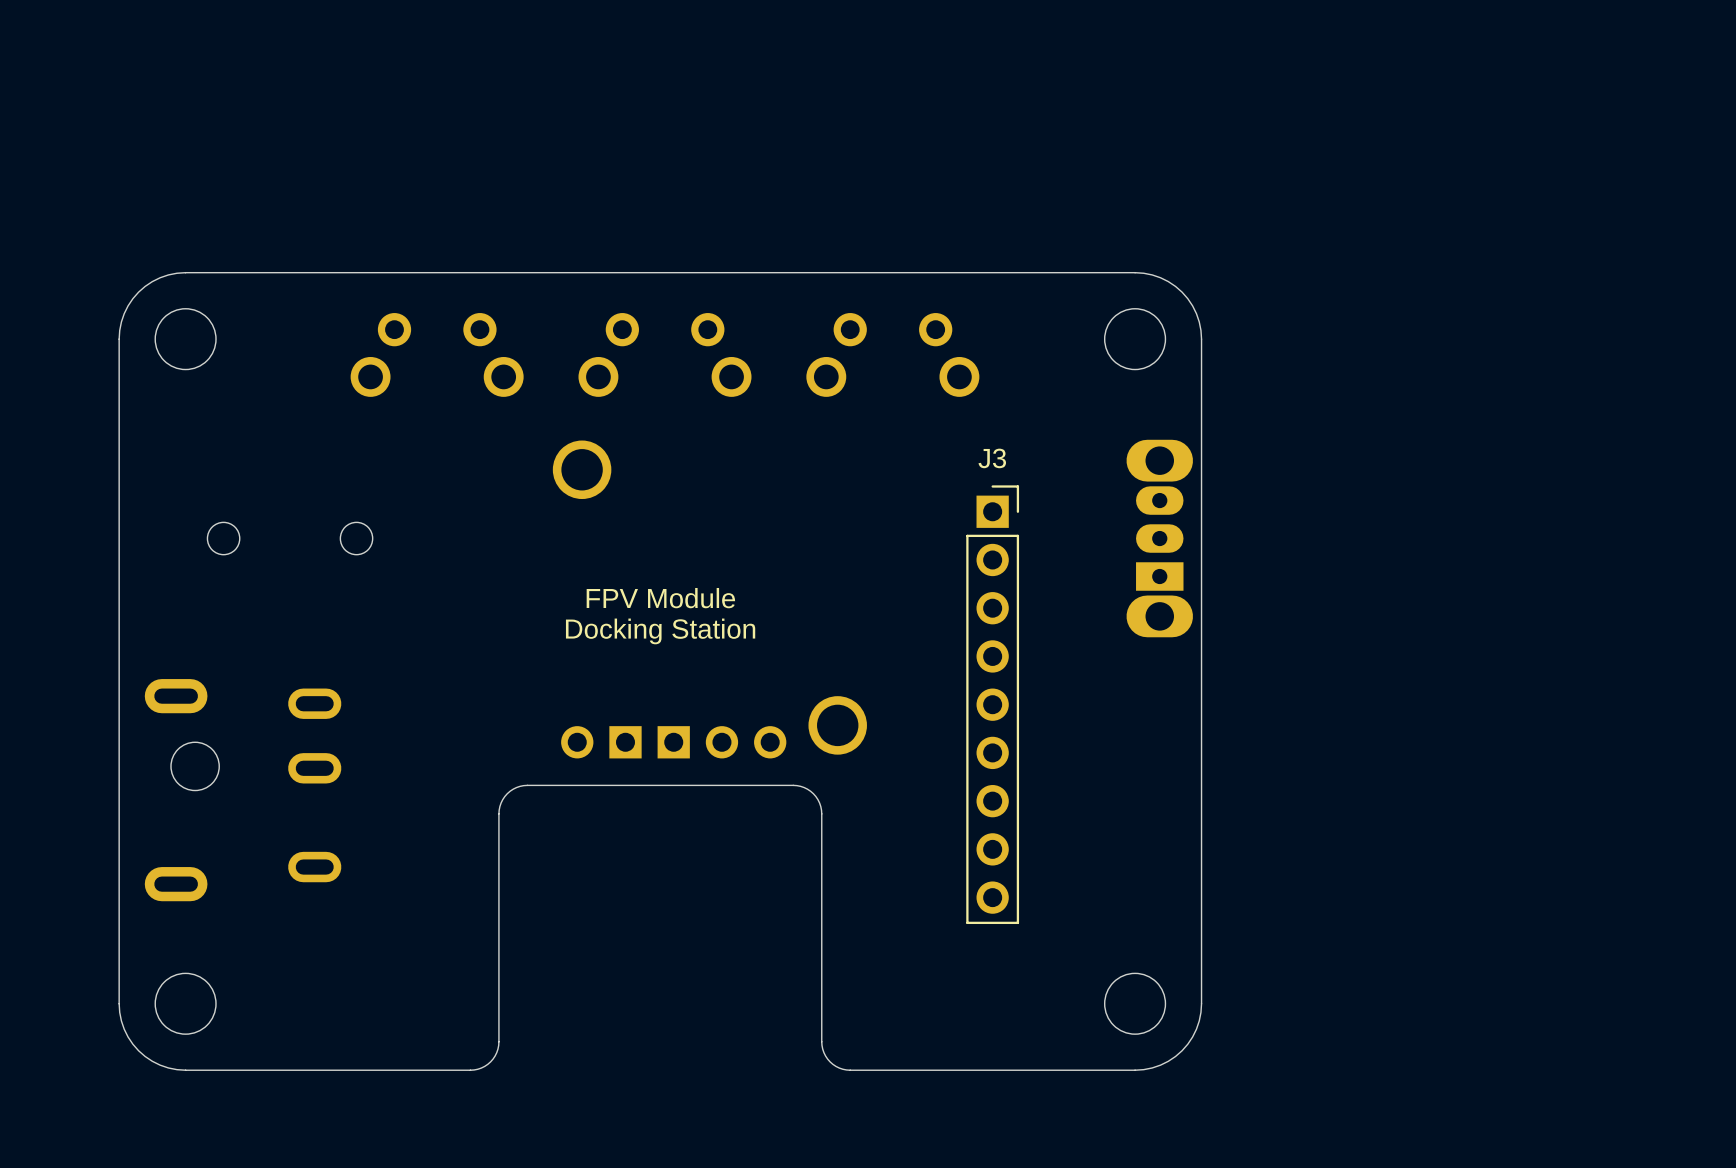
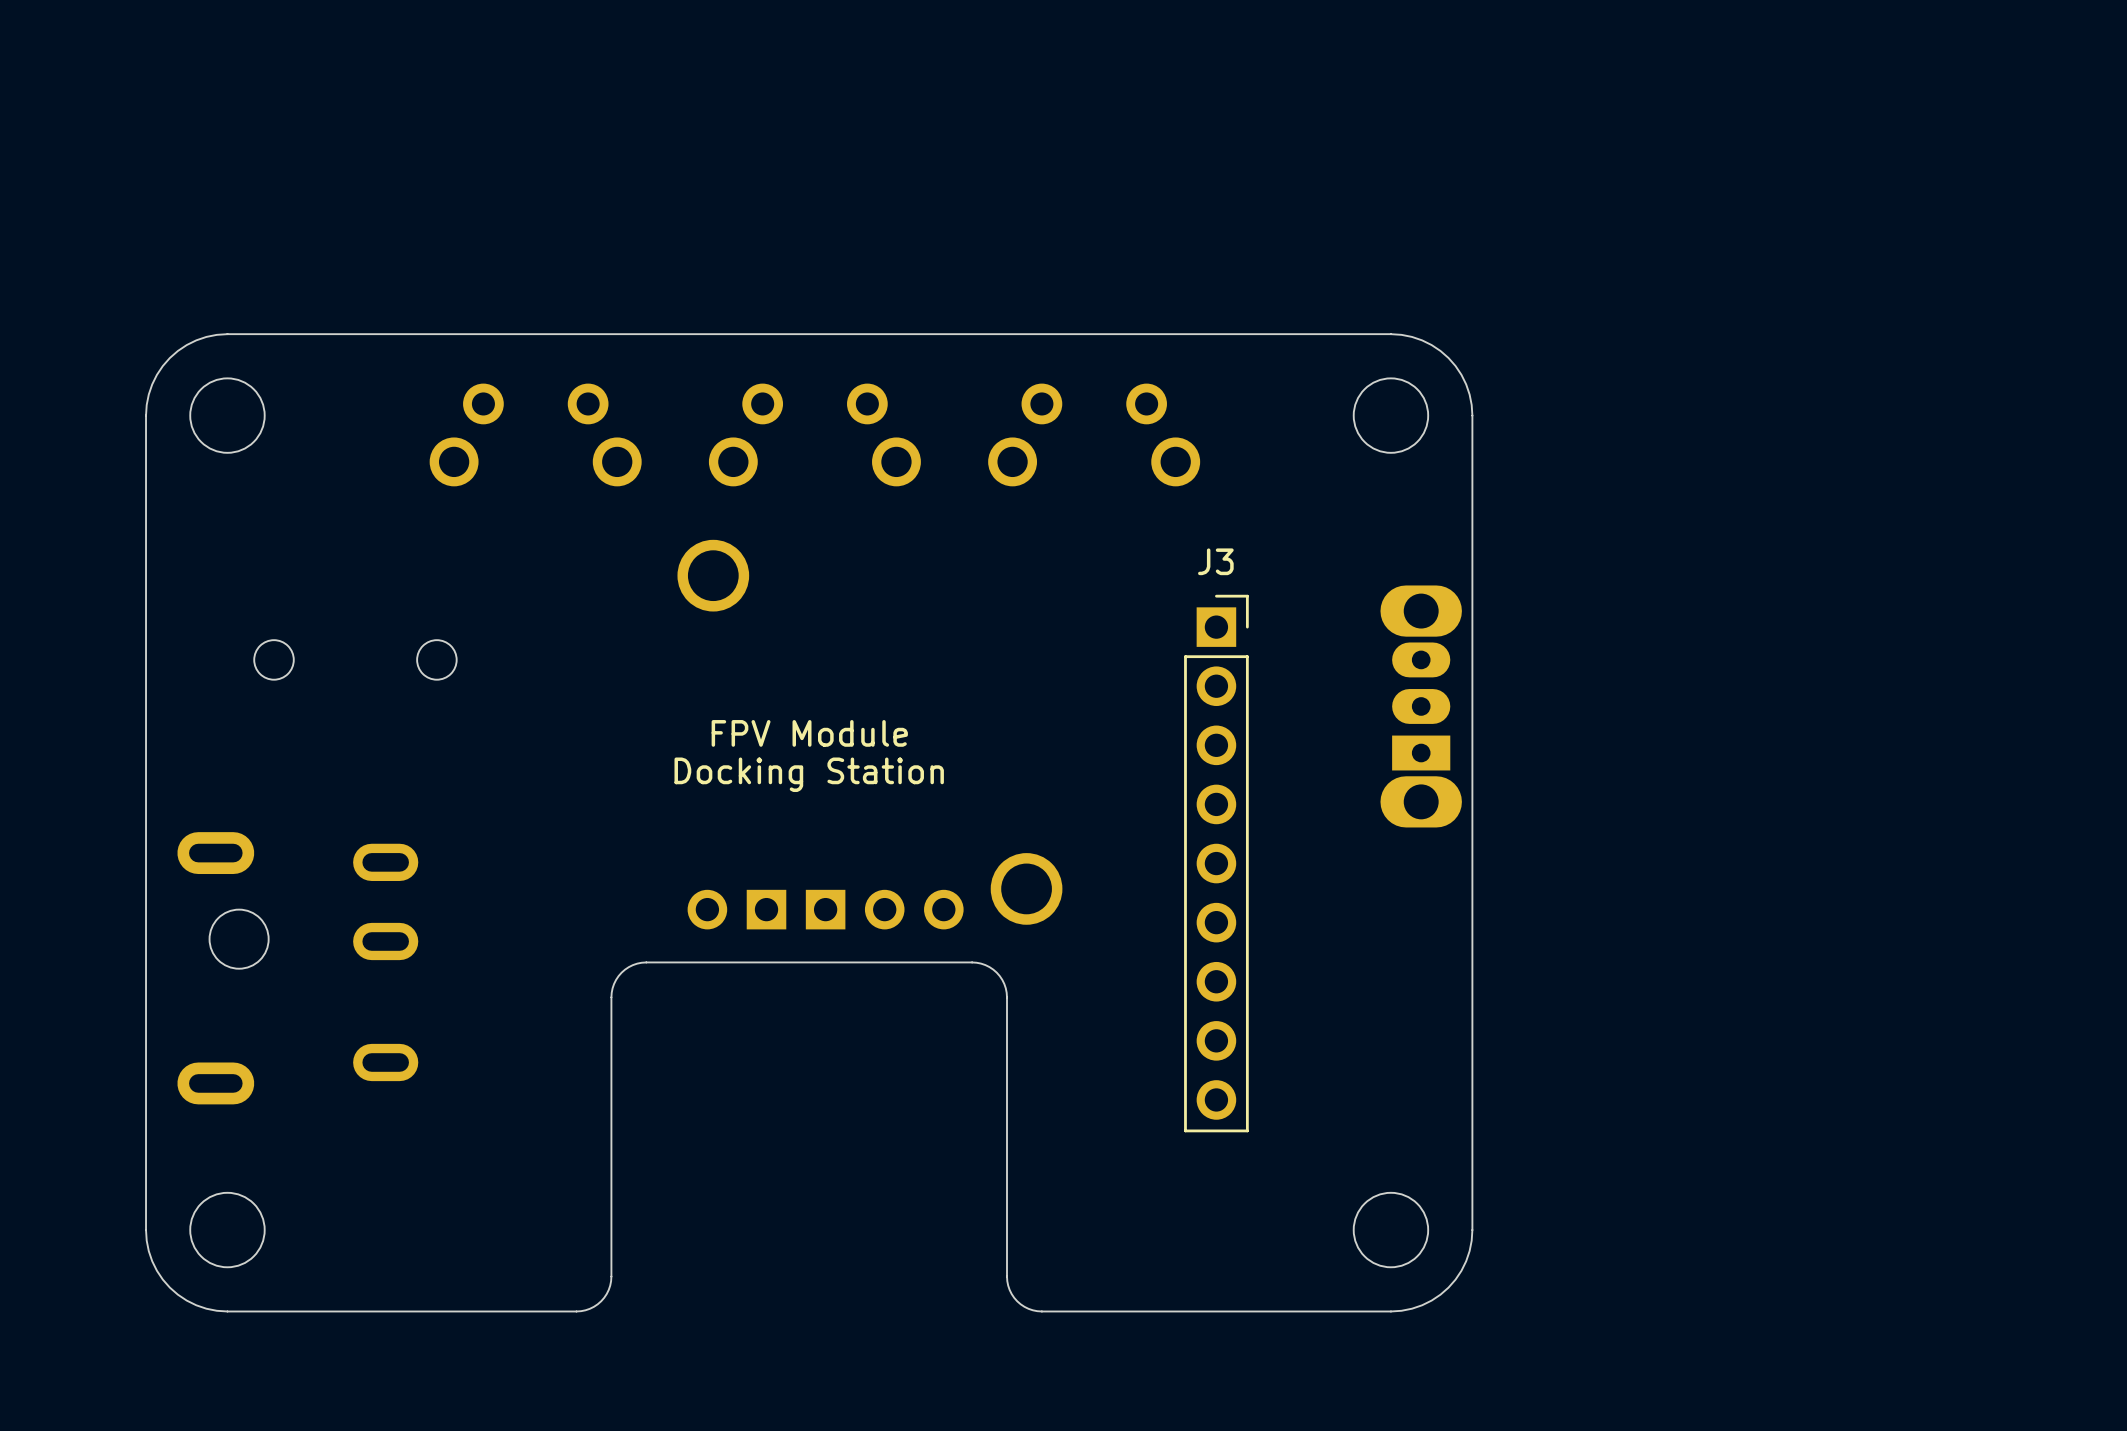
part position: (1159, 538) -> (1421, 706)

